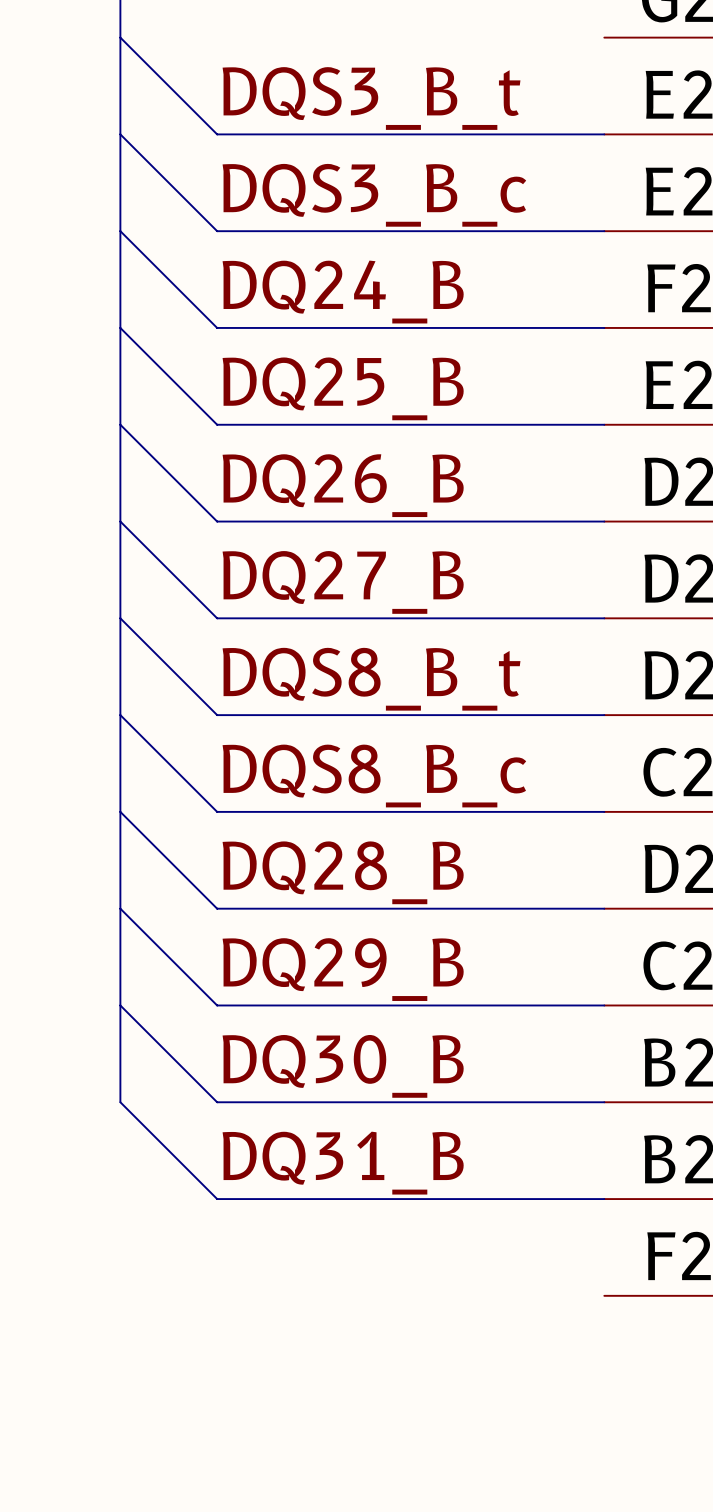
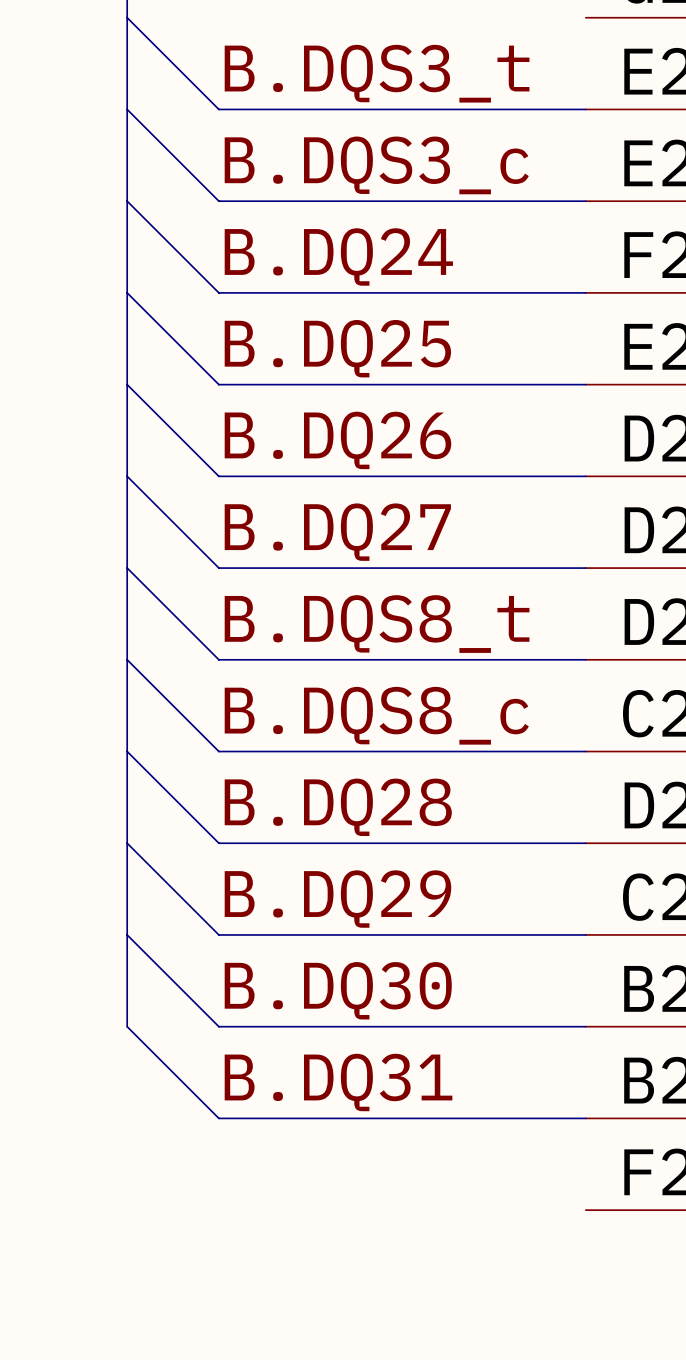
label: DQS3_B_t (371, 98) -> B.DQS3_t (377, 73)
label: DQS3_B_c (374, 195) -> B.DQS3_c (376, 165)
label: DQ24_B (343, 292) -> B.DQ24 (338, 256)
label: DQ25_B (343, 388) -> B.DQ25 (337, 348)
label: DQ26_B (343, 485) -> B.DQ26 (337, 440)
label: DQ27_B (343, 582) -> B.DQ27 (337, 532)
label: DQS8_B_t (371, 679) -> B.DQS8_t (377, 624)
label: DQS8_B_c (374, 776) -> B.DQS8_c (376, 715)
label: DQ28_B (343, 872) -> B.DQ28 (338, 807)
label: DQ29_B (343, 969) -> B.DQ29 (337, 899)
label: DQ30_B (343, 1066) -> B.DQ30 (338, 990)
label: DQ31_B (343, 1163) -> B.DQ31 (338, 1082)

